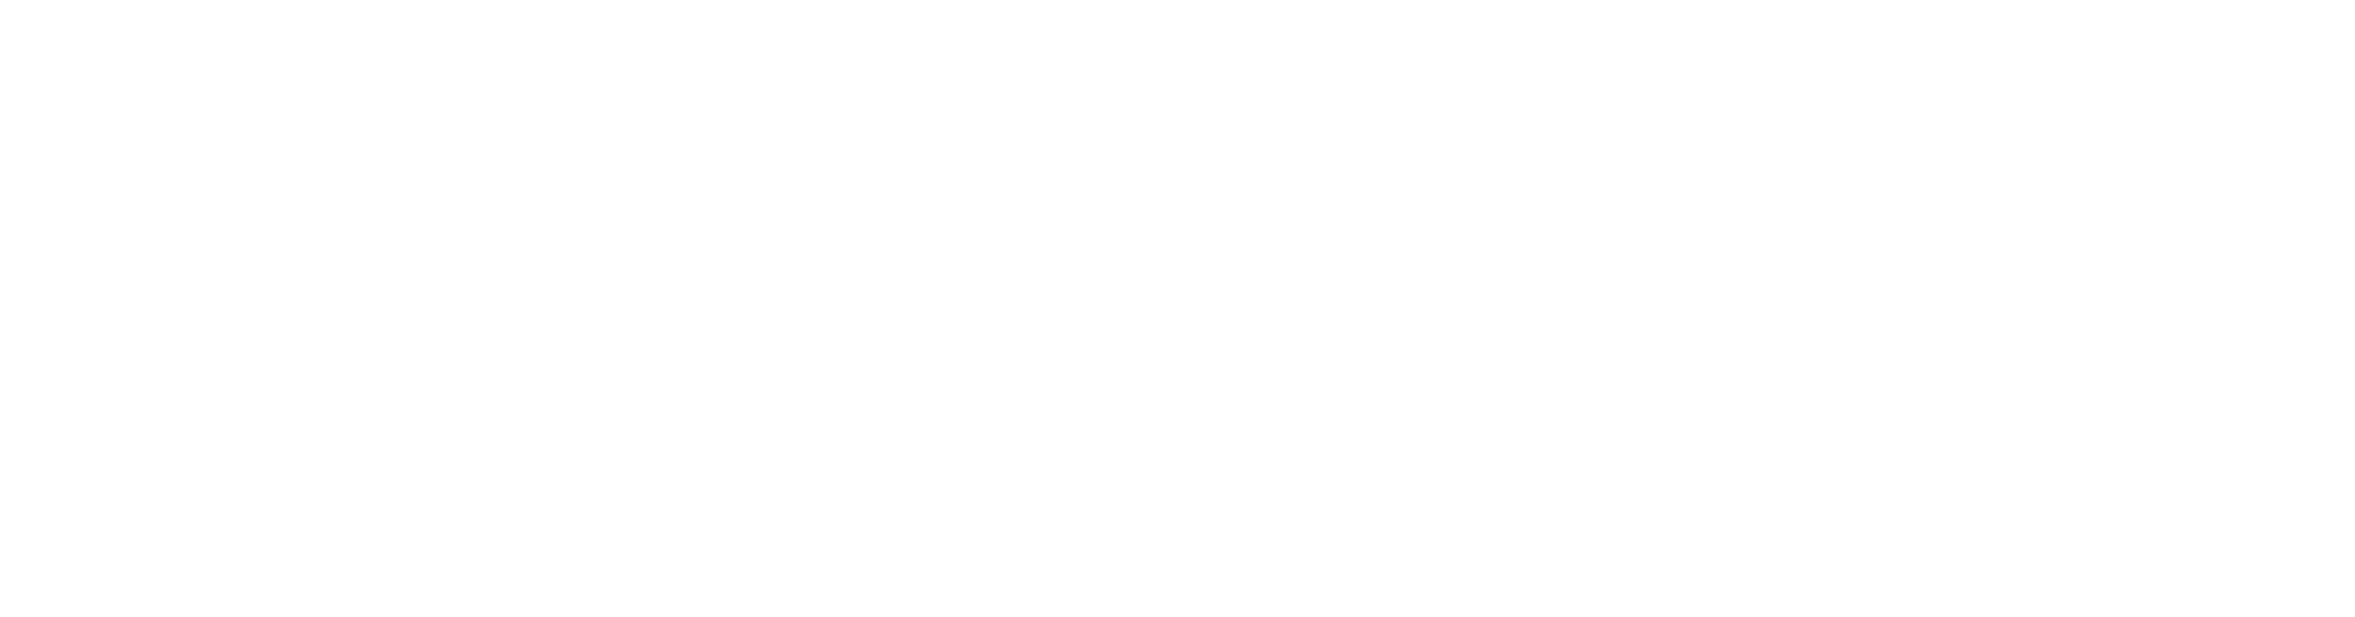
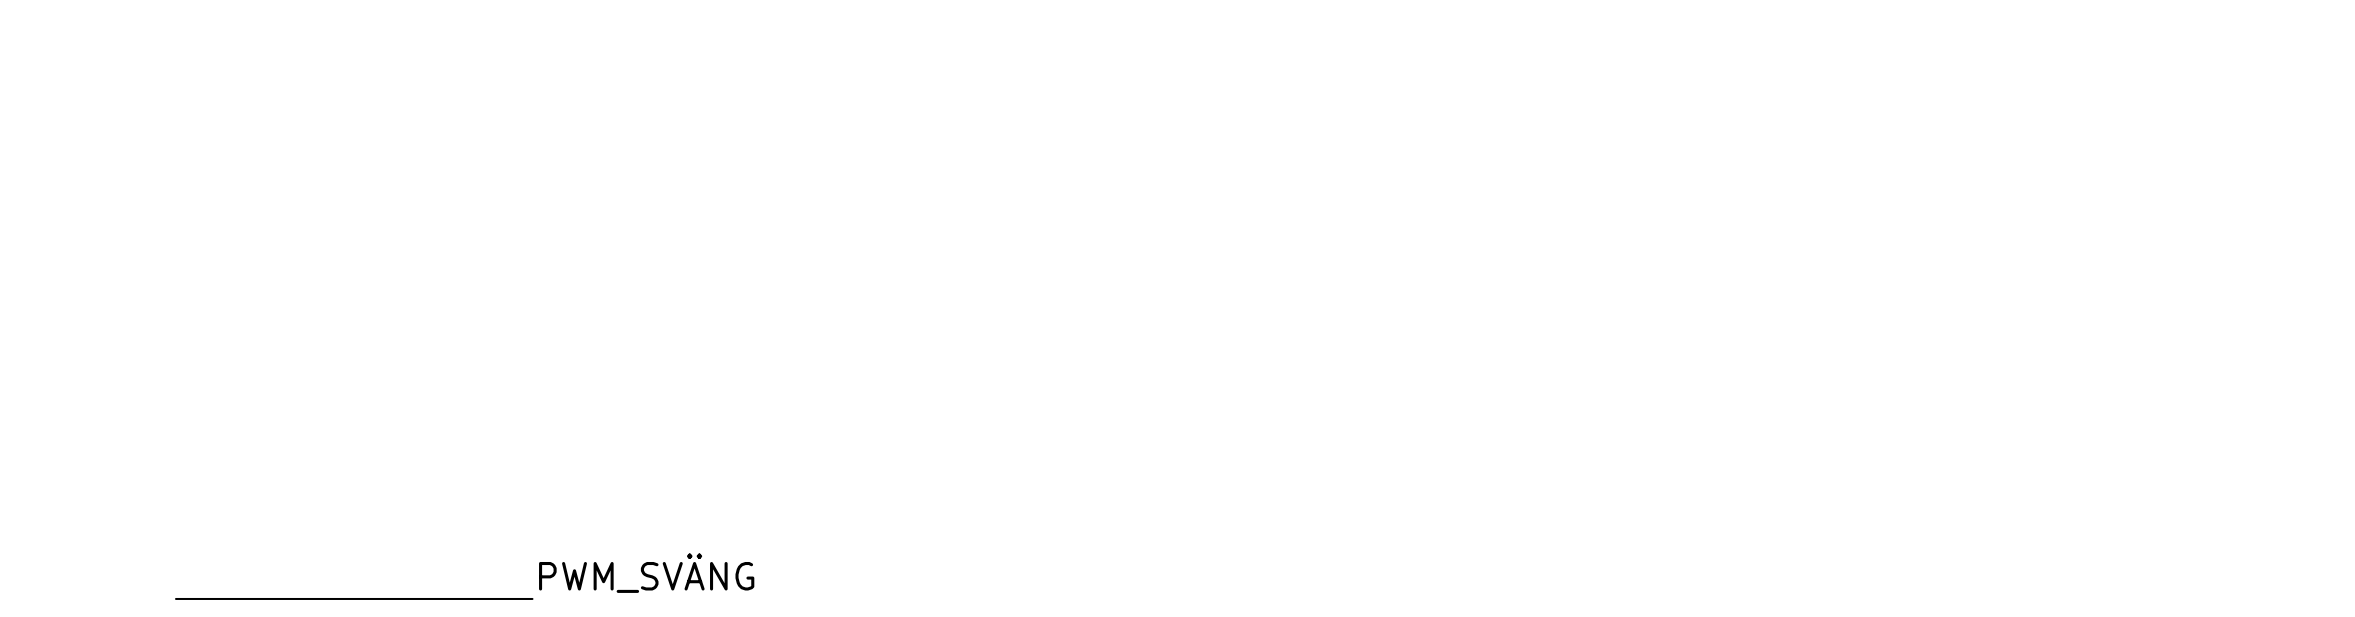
label: none -> PWM_SVÄNG (646, 573)
wire: none -> (175, 598) (532, 598)

